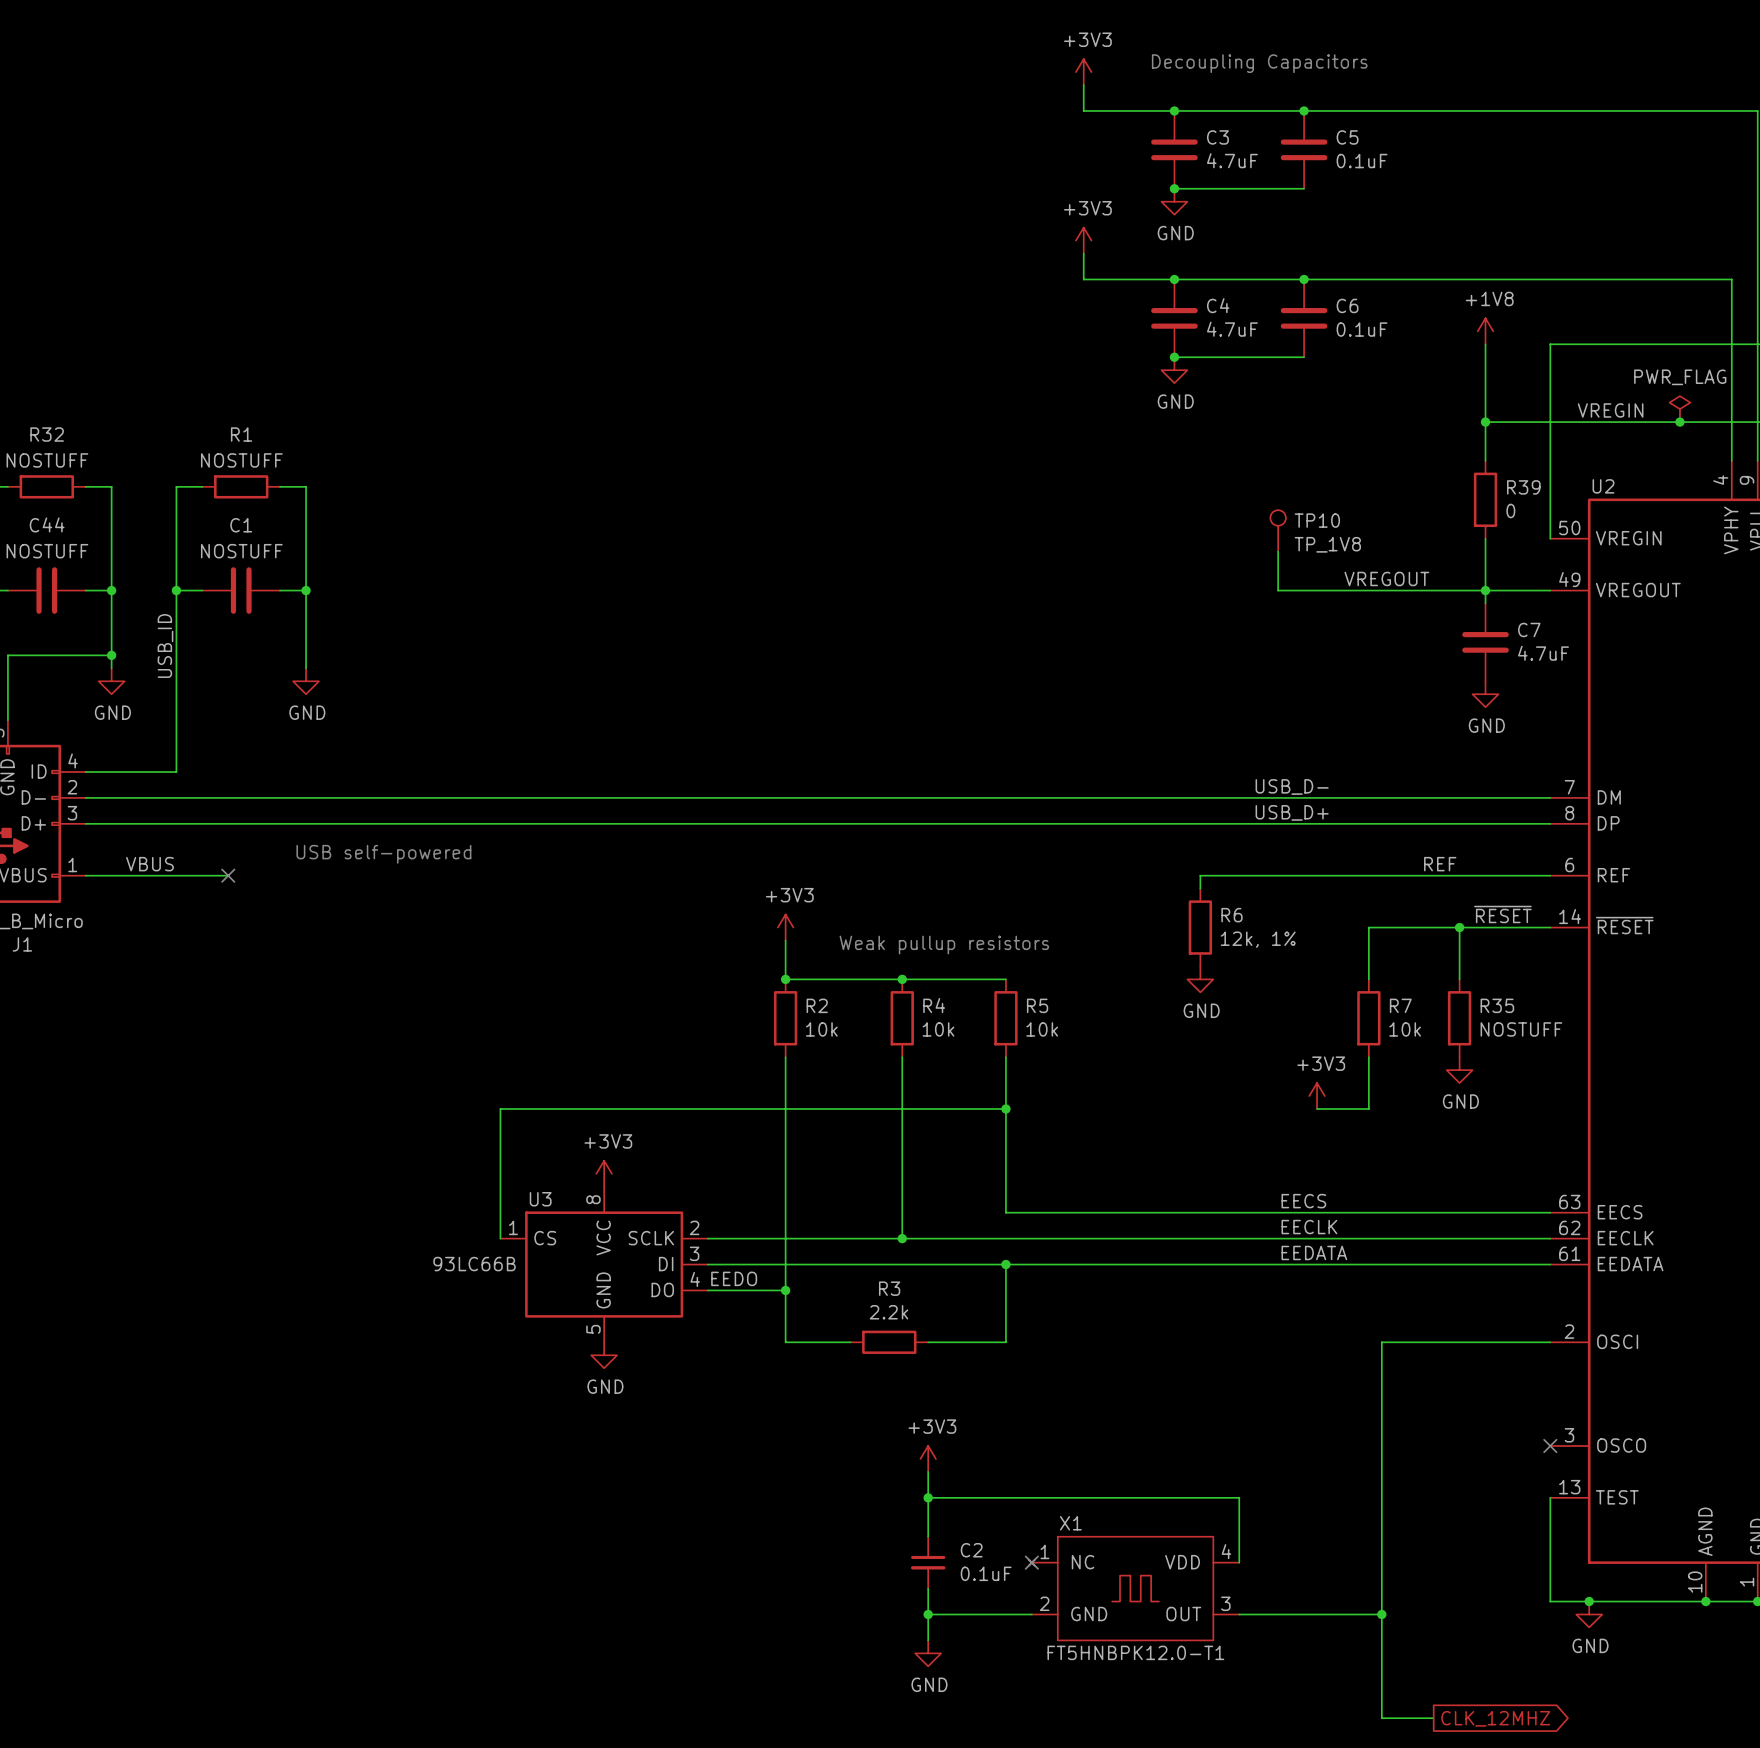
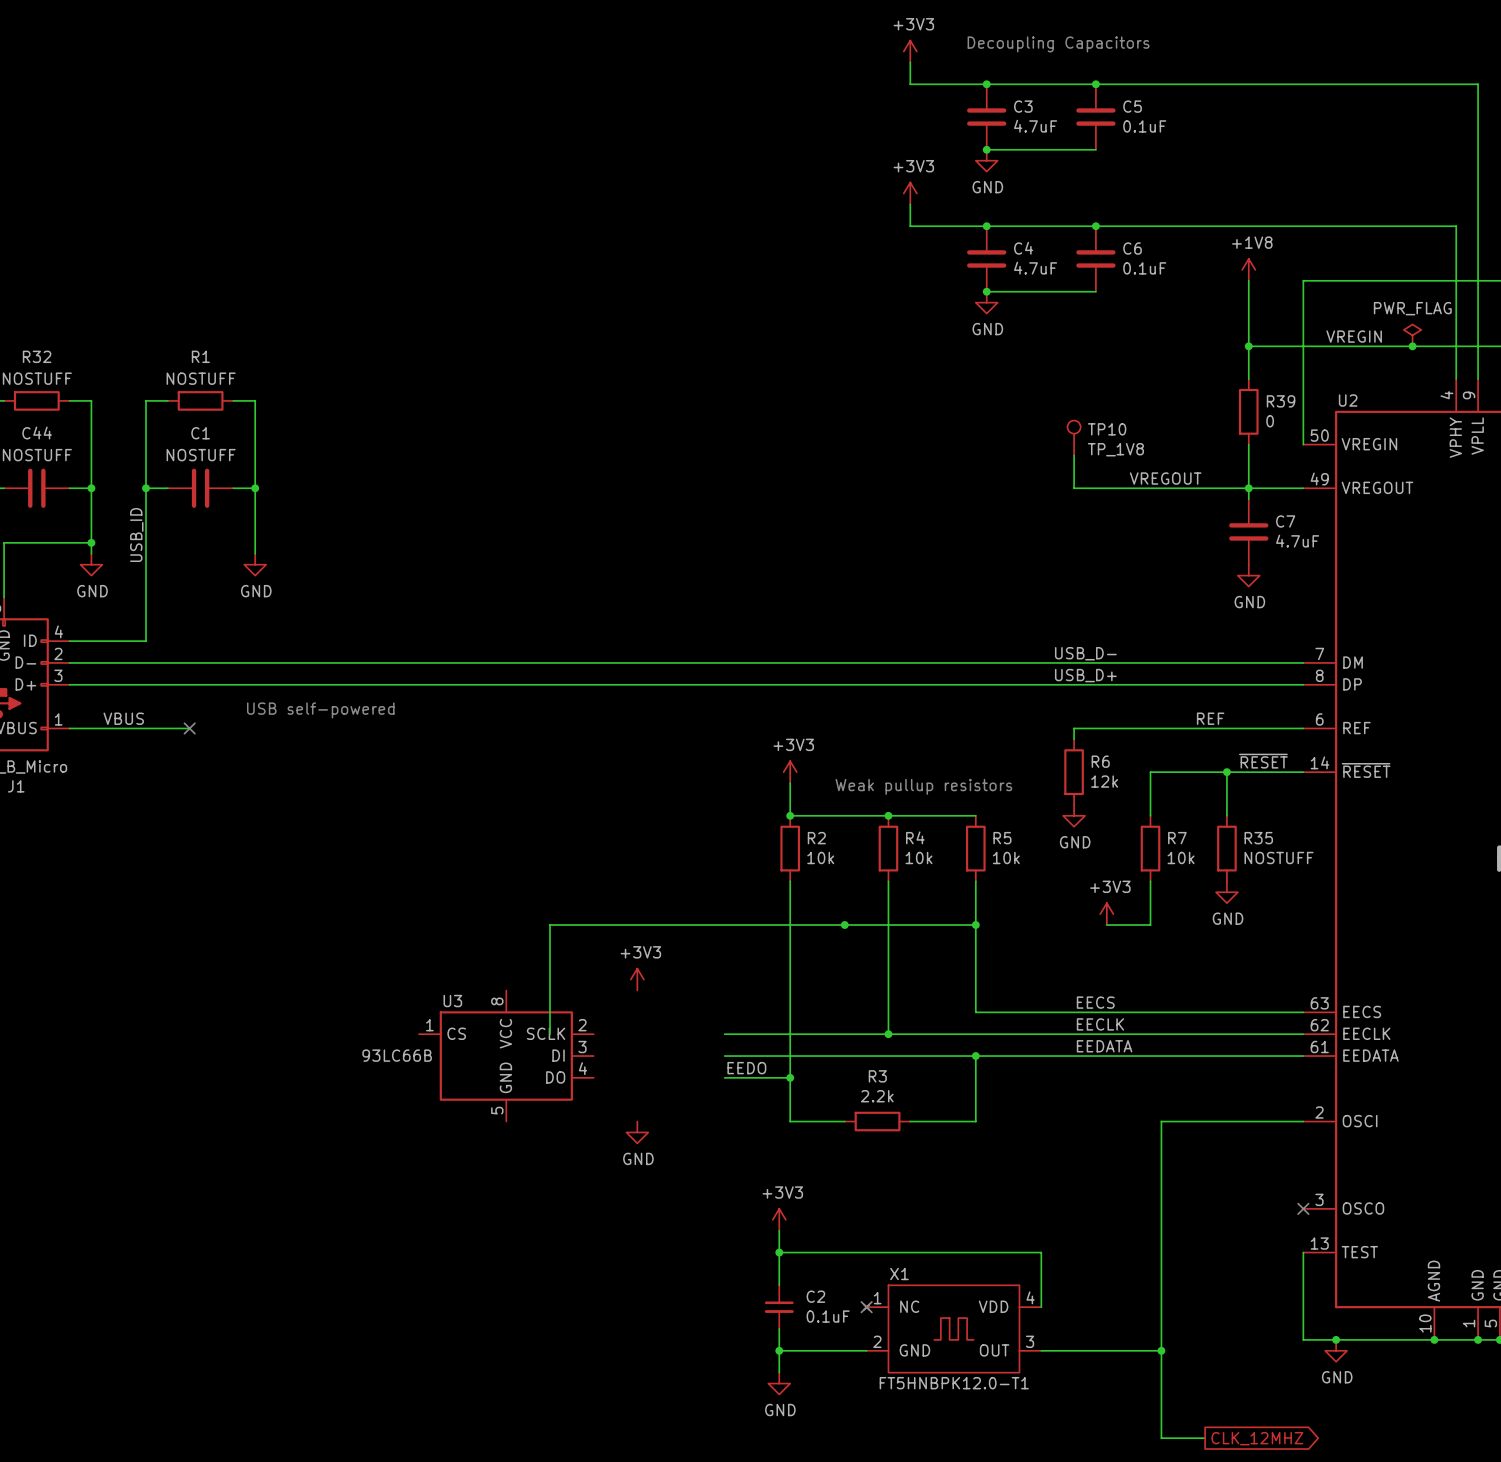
wire: (1278, 875) (1200, 875) (1200, 888) -> (1074, 728) (1074, 739)
power symbol: +3V3 (785, 927) -> none
power symbol: none -> +3V3 (790, 772)
R6 position: (1200, 927) -> (1074, 772)
R6 value: 12k, 1% (1258, 939) -> 12k (1104, 781)
wire: (785, 940) (785, 979) (941, 979) -> (790, 783) (790, 815)
text position: Weak pullup resistors (944, 945) -> Weak pullup resistors (923, 786)
junction: (785, 979) -> none
junction position: (902, 979) -> (790, 815)
wire: none -> (844, 815) (975, 815)
junction: none -> (888, 815)
power symbol position: GND (1200, 979) -> GND (1074, 815)
R2 position: (785, 1018) -> (790, 848)
R4 position: (902, 1018) -> (888, 848)
R5 position: (1005, 1018) -> (975, 848)
wire: (785, 1057) (785, 1342) (850, 1342) -> none
wire: (902, 1057) (902, 1238) -> (888, 881) (888, 1034)
wire: (1005, 1057) (1005, 1212) (1161, 1212) -> (975, 881) (975, 1012)
wire: (655, 1109) (500, 1109) (500, 1238) -> (549, 925) (549, 1034)
wire: none -> (844, 925) (975, 925)
junction: none -> (975, 925)
power symbol: +3V3 (604, 1173) -> none
power symbol: none -> +3V3 (637, 979)
wire: (707, 1238) (863, 1238) -> none
junction: (902, 1238) -> none
junction: none -> (888, 1034)
wire: (707, 1264) (863, 1264) -> none
wire: (1005, 1264) (1005, 1342) -> none
junction: (1005, 1264) -> none
wire: none -> (975, 1056) (975, 1121) (910, 1121)
junction: none -> (975, 1056)
label position: EEDO (734, 1278) -> EEDO (746, 1068)
wire: (707, 1290) (785, 1290) -> (724, 1077) (790, 1077)
junction: (785, 1290) -> none
junction: none -> (790, 1077)
R3 position: (889, 1342) -> (877, 1121)
wire: (928, 1342) (941, 1342) -> (790, 881) (790, 1121)
power symbol position: GND (604, 1355) -> GND (637, 1132)

